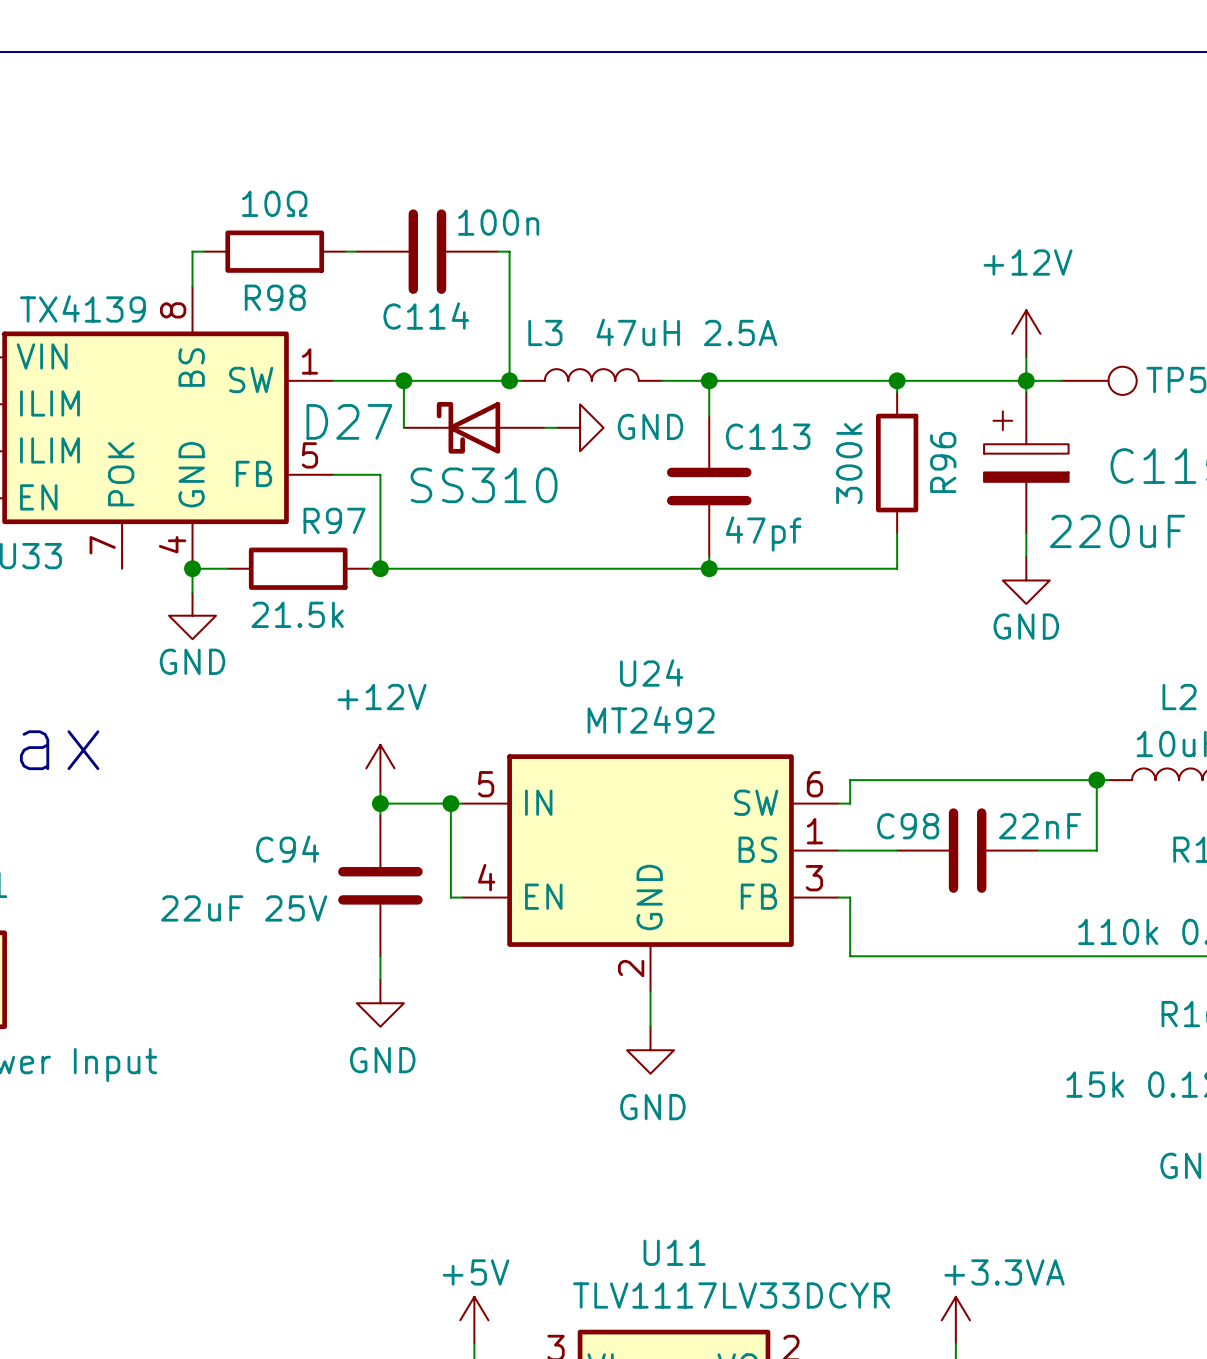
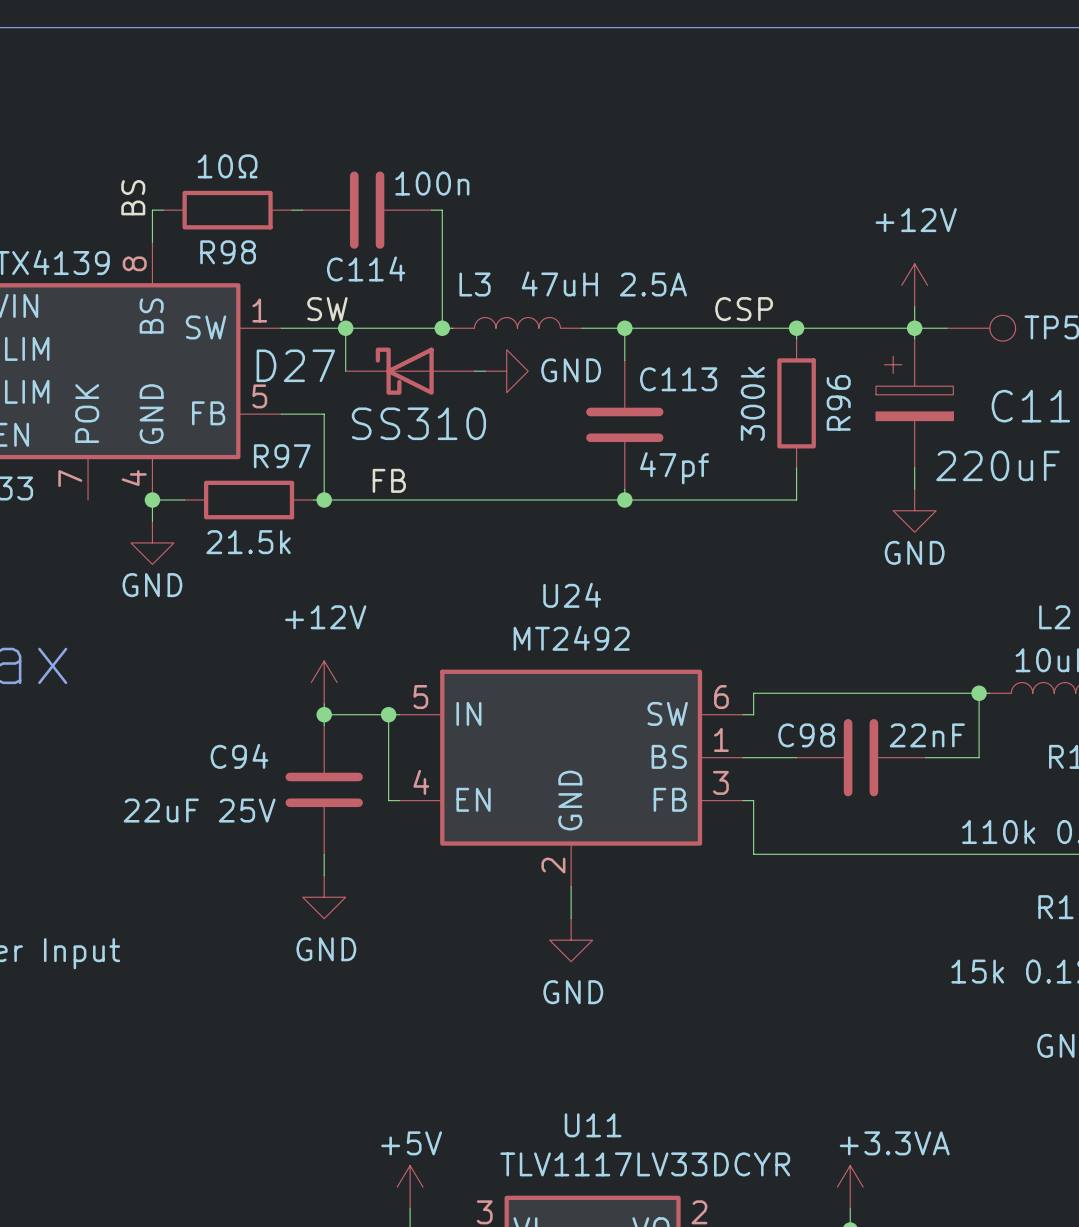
label: none -> BS (133, 197)
label: none -> SW (327, 309)
label: none -> CSP (744, 309)
label: none -> FB (389, 480)

